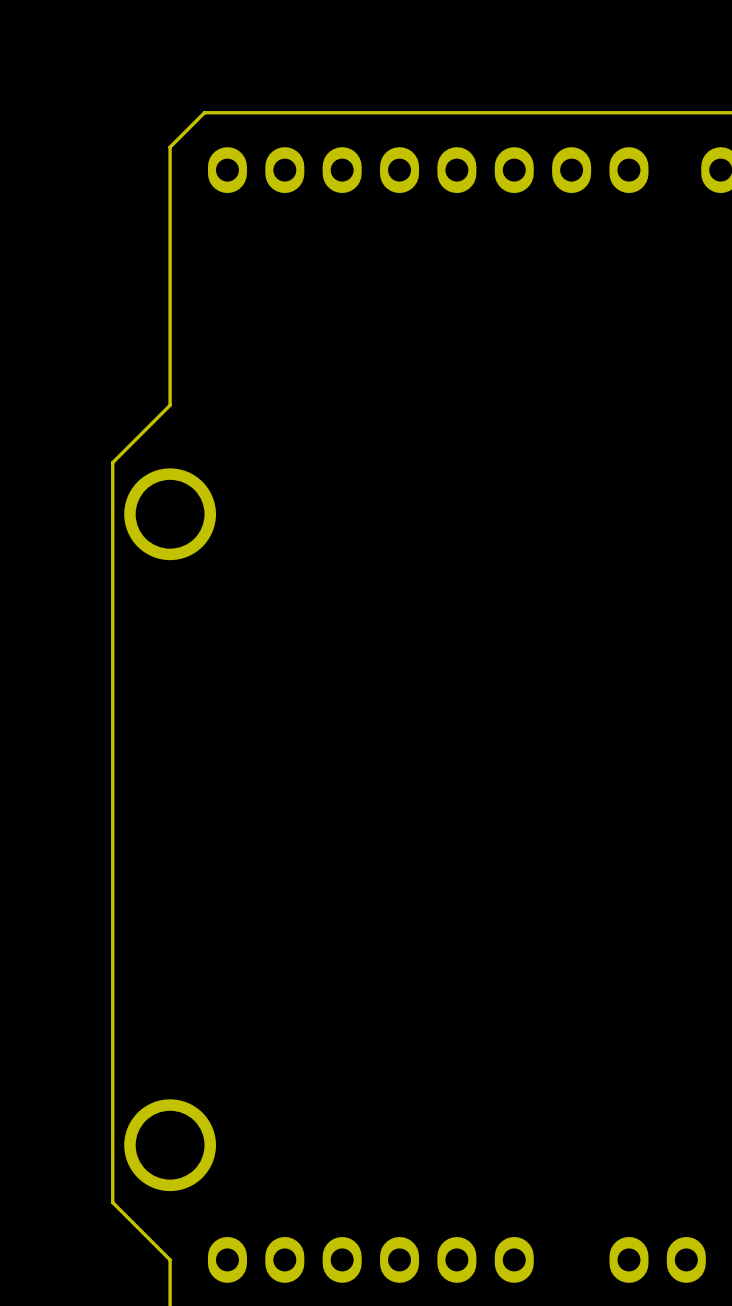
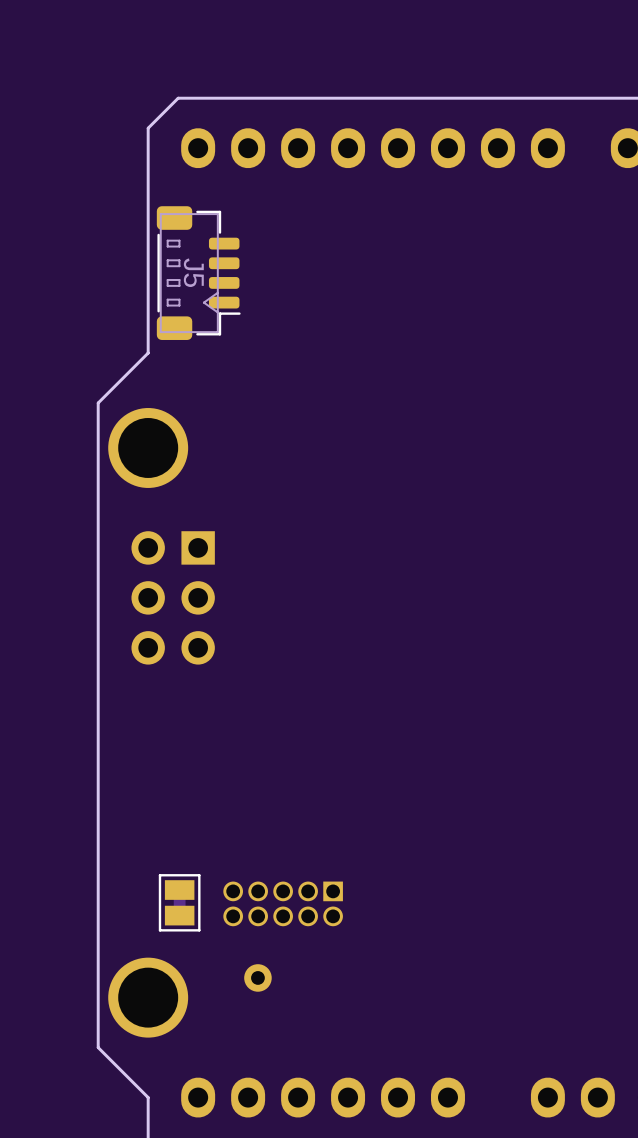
J5: none -> (198, 273)
part: none -> (173, 597)
part: none -> (179, 902)
part: none -> (283, 903)
part: none -> (257, 977)

